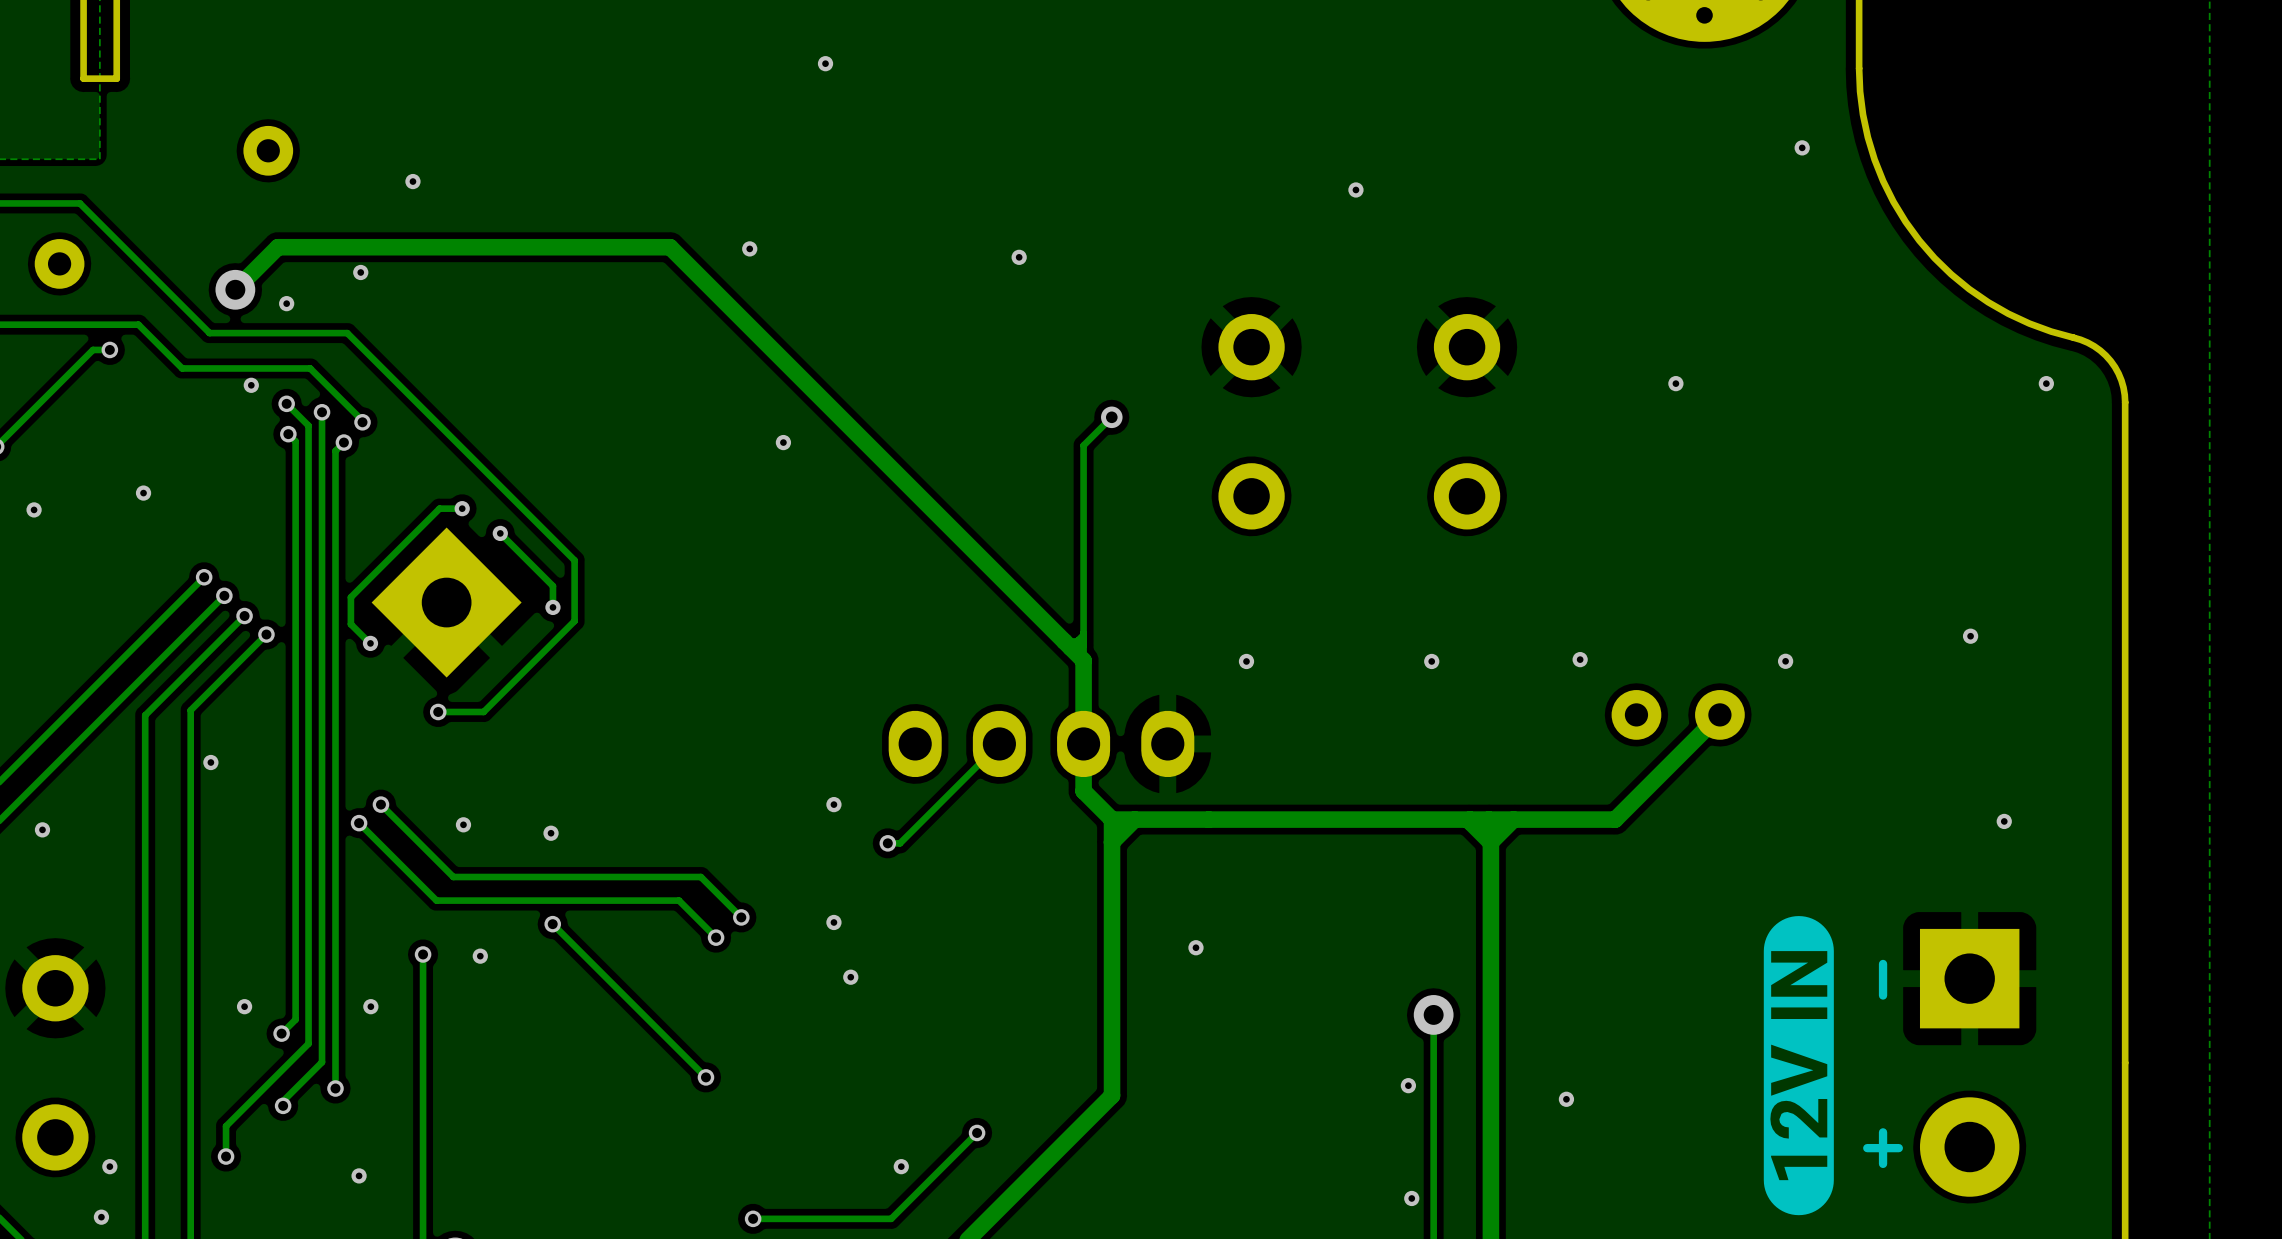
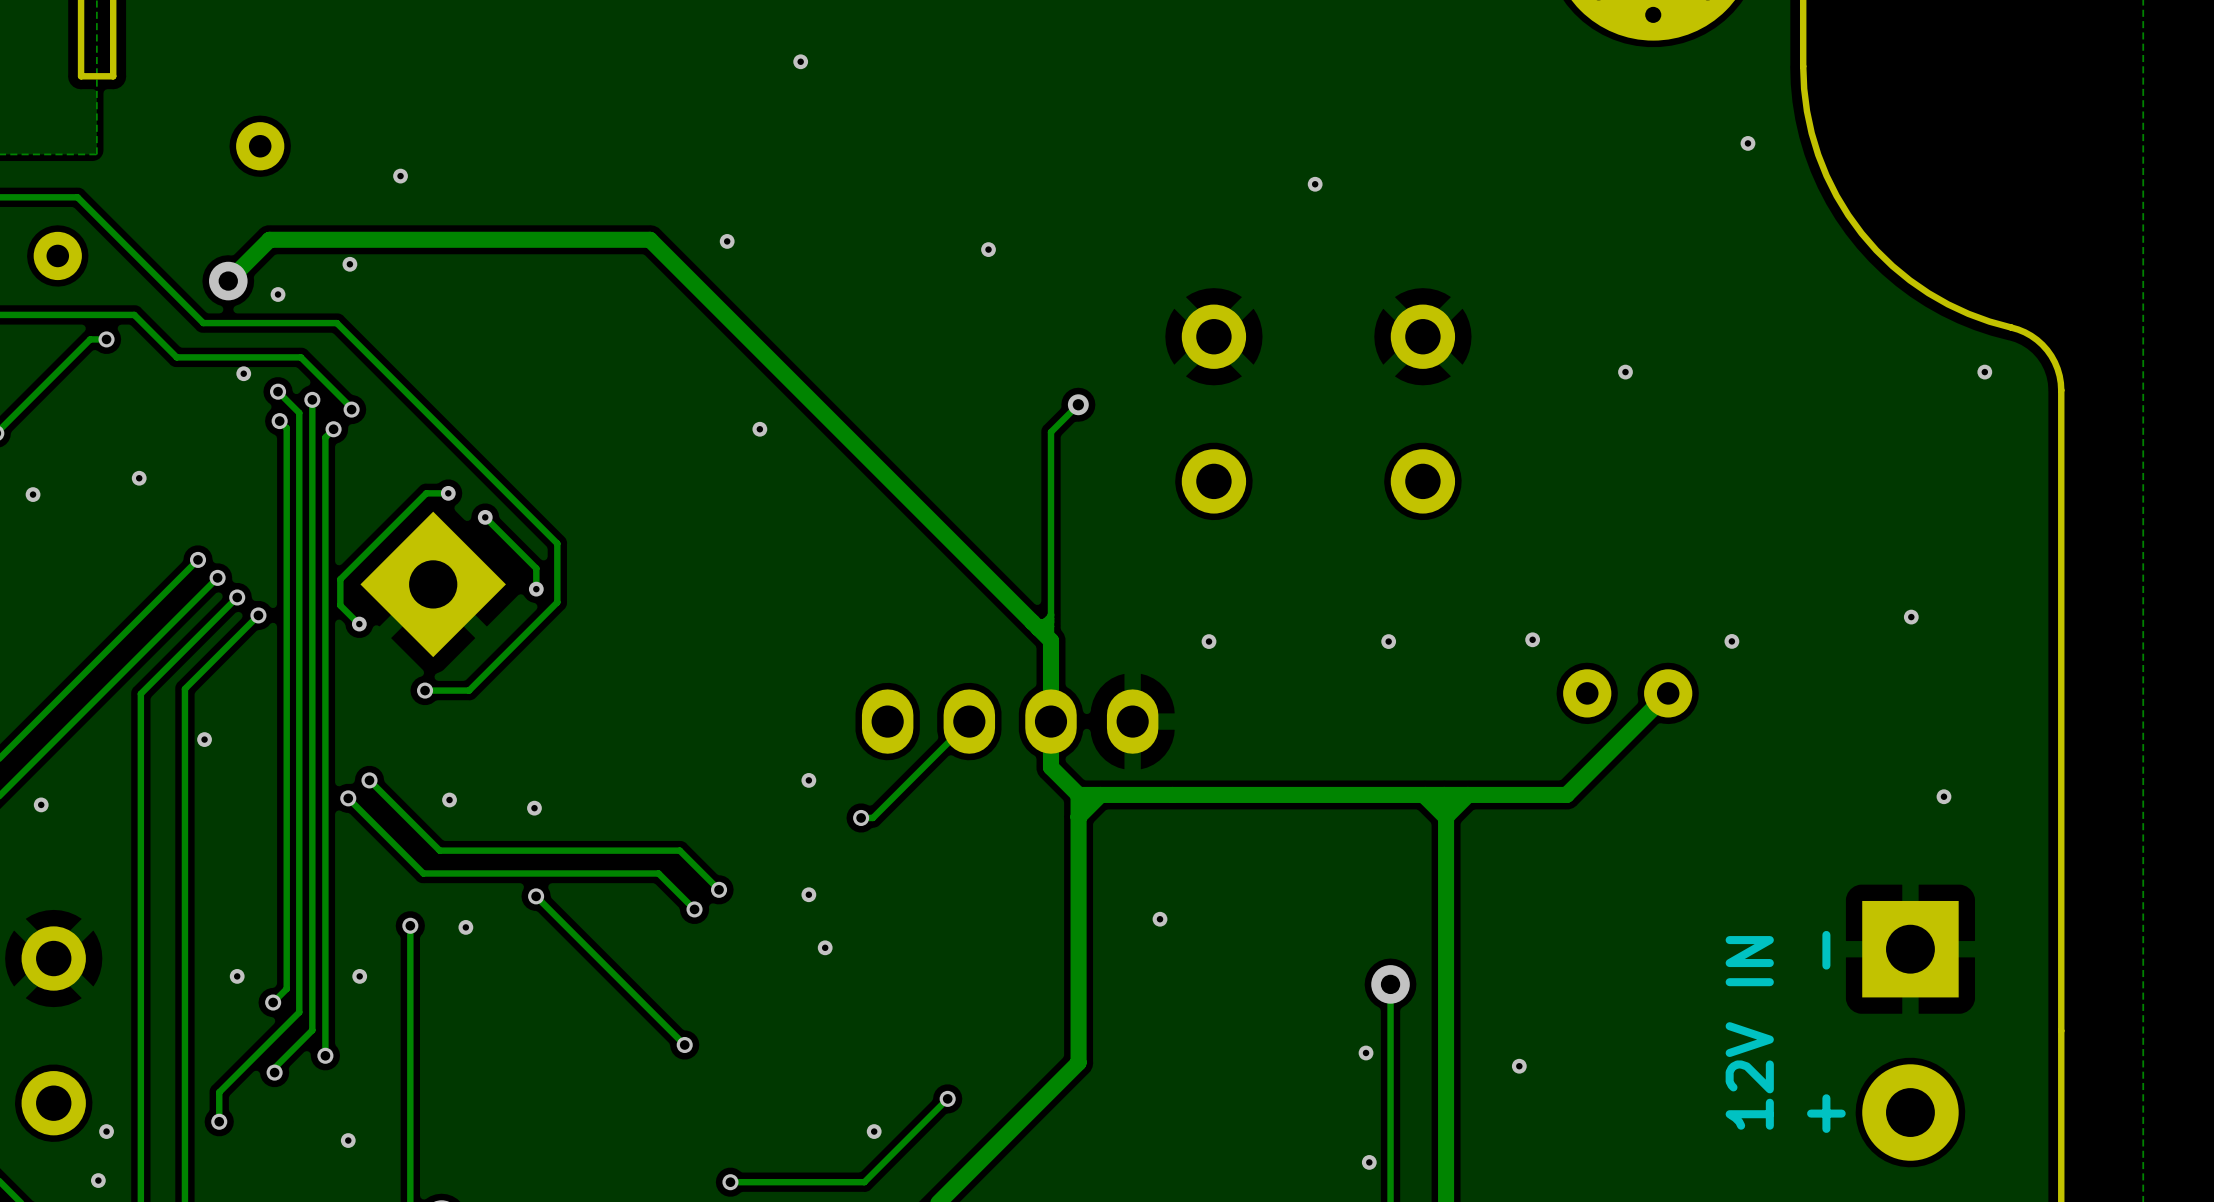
drawing: [1763, 916, 1834, 1216] -> none
text: none -> 12V IN (1749, 1032)

